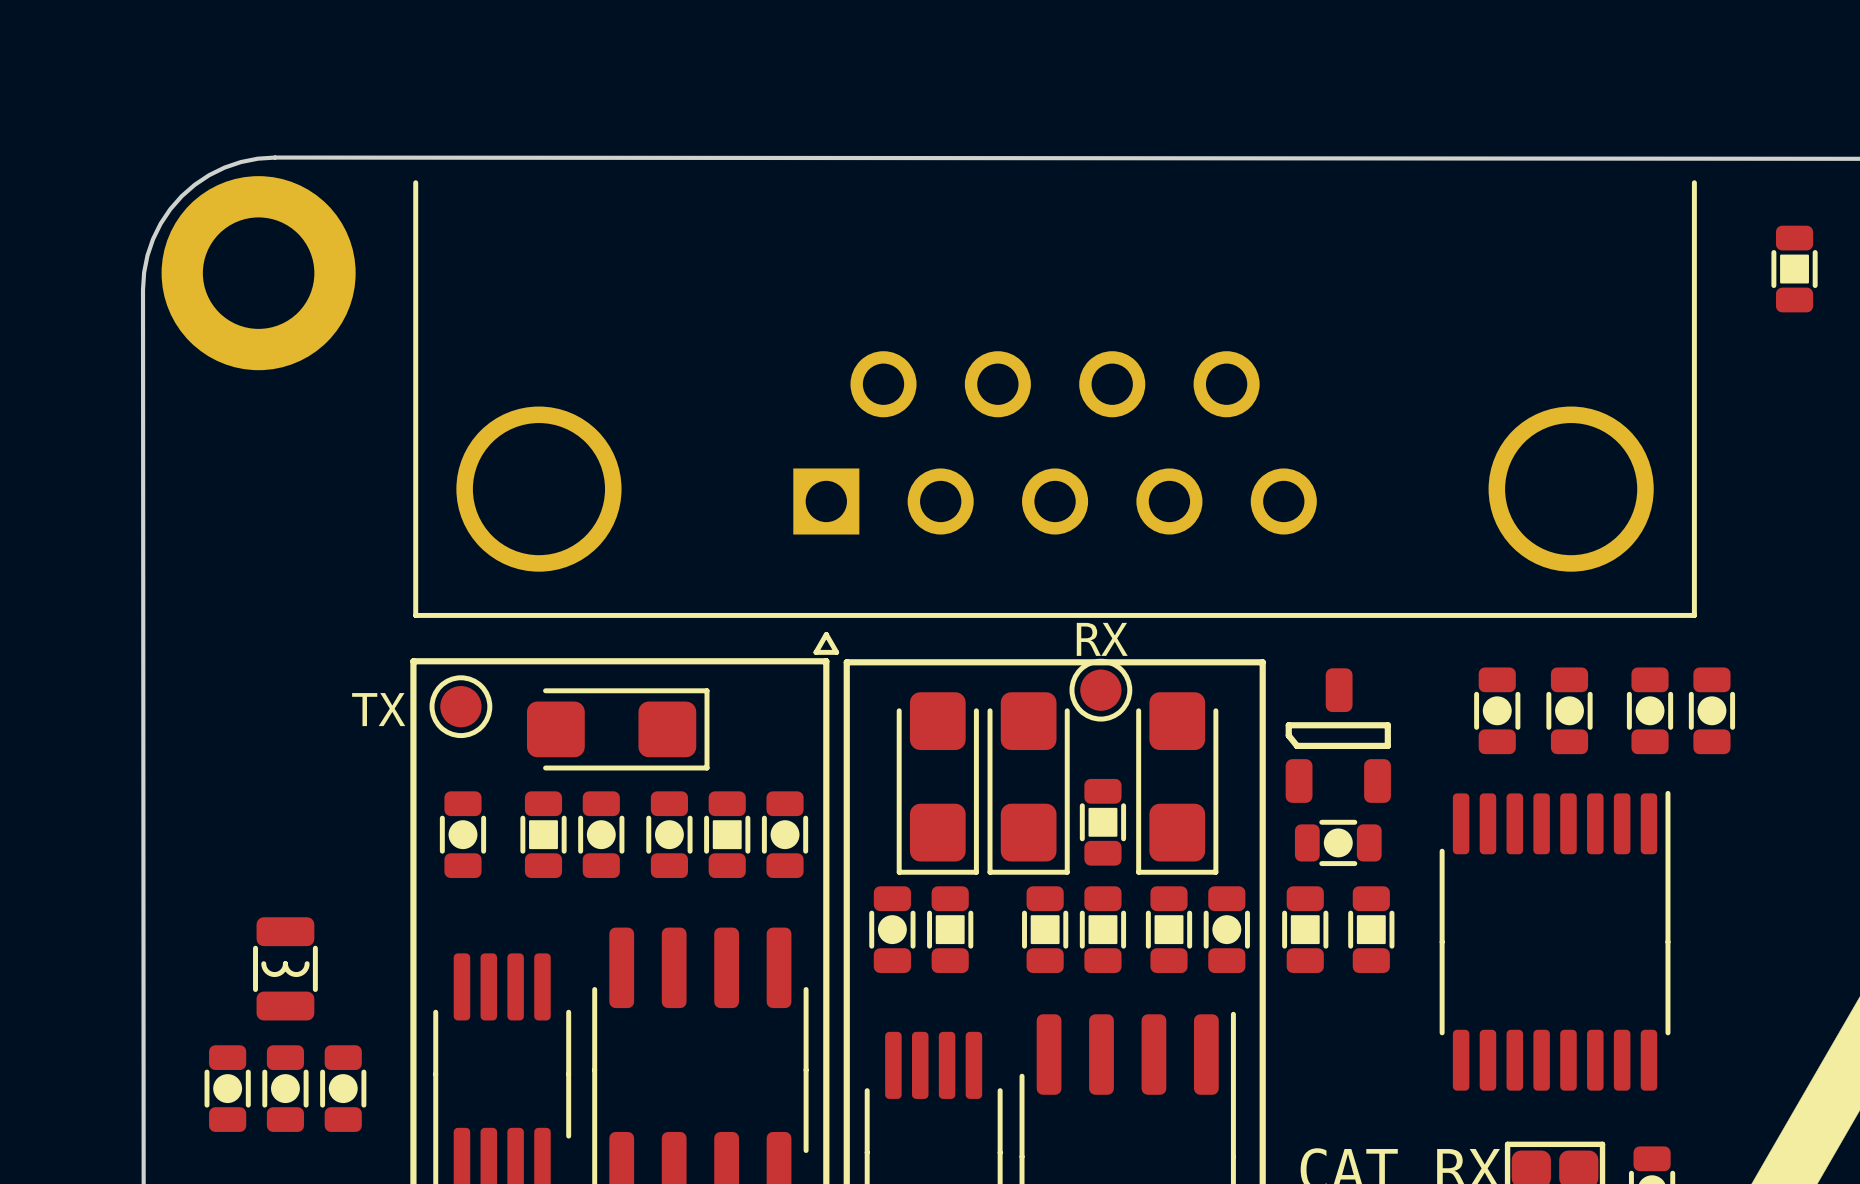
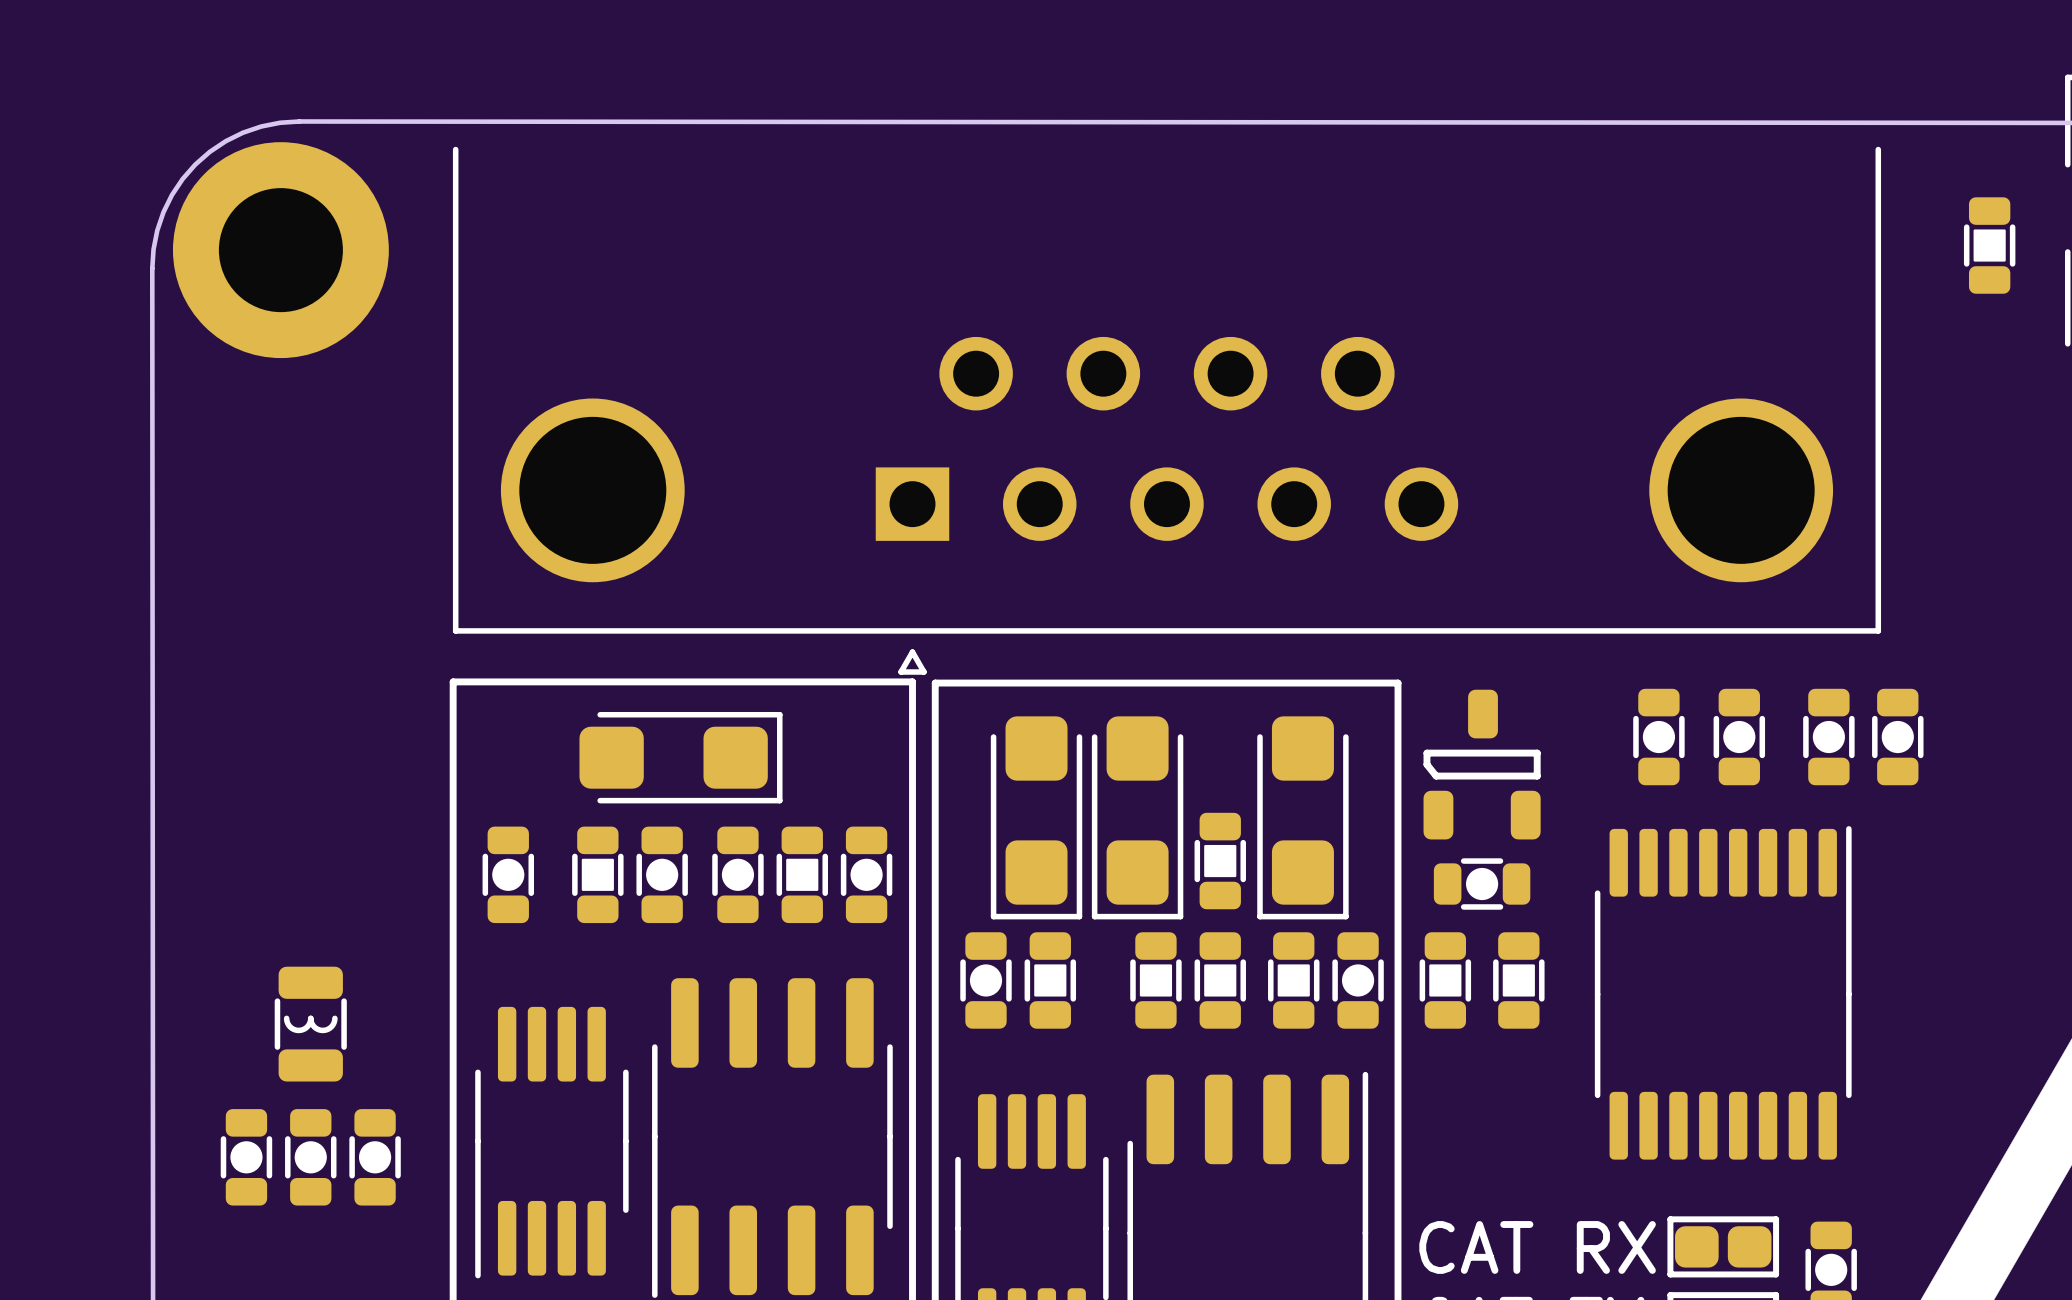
text: RX (1102, 639) -> none
part: (1100, 690) -> none
part: (460, 706) -> none
text: TX (378, 709) -> none

